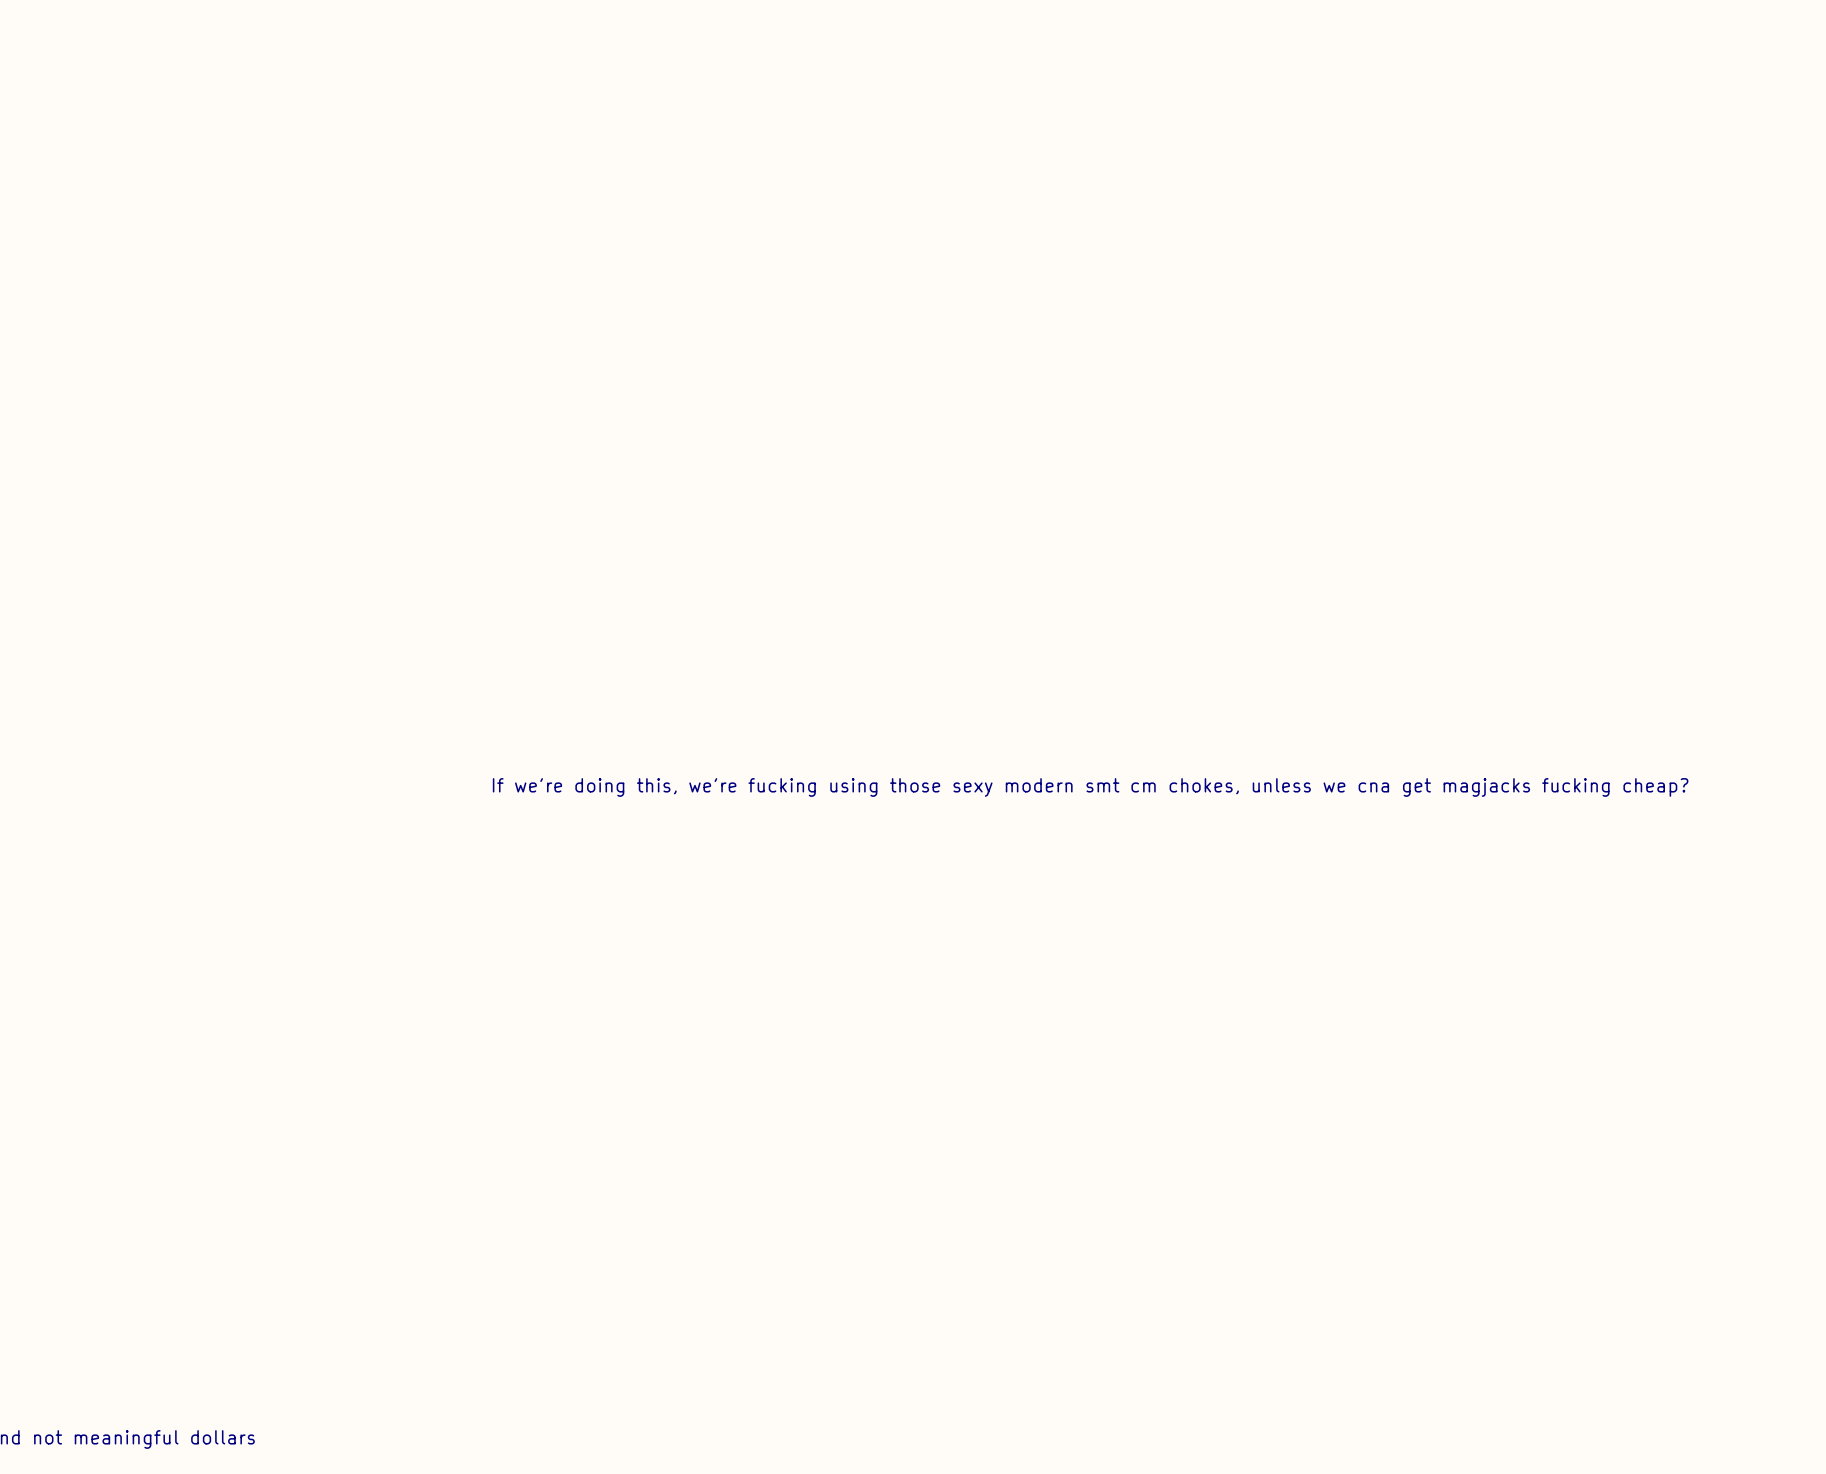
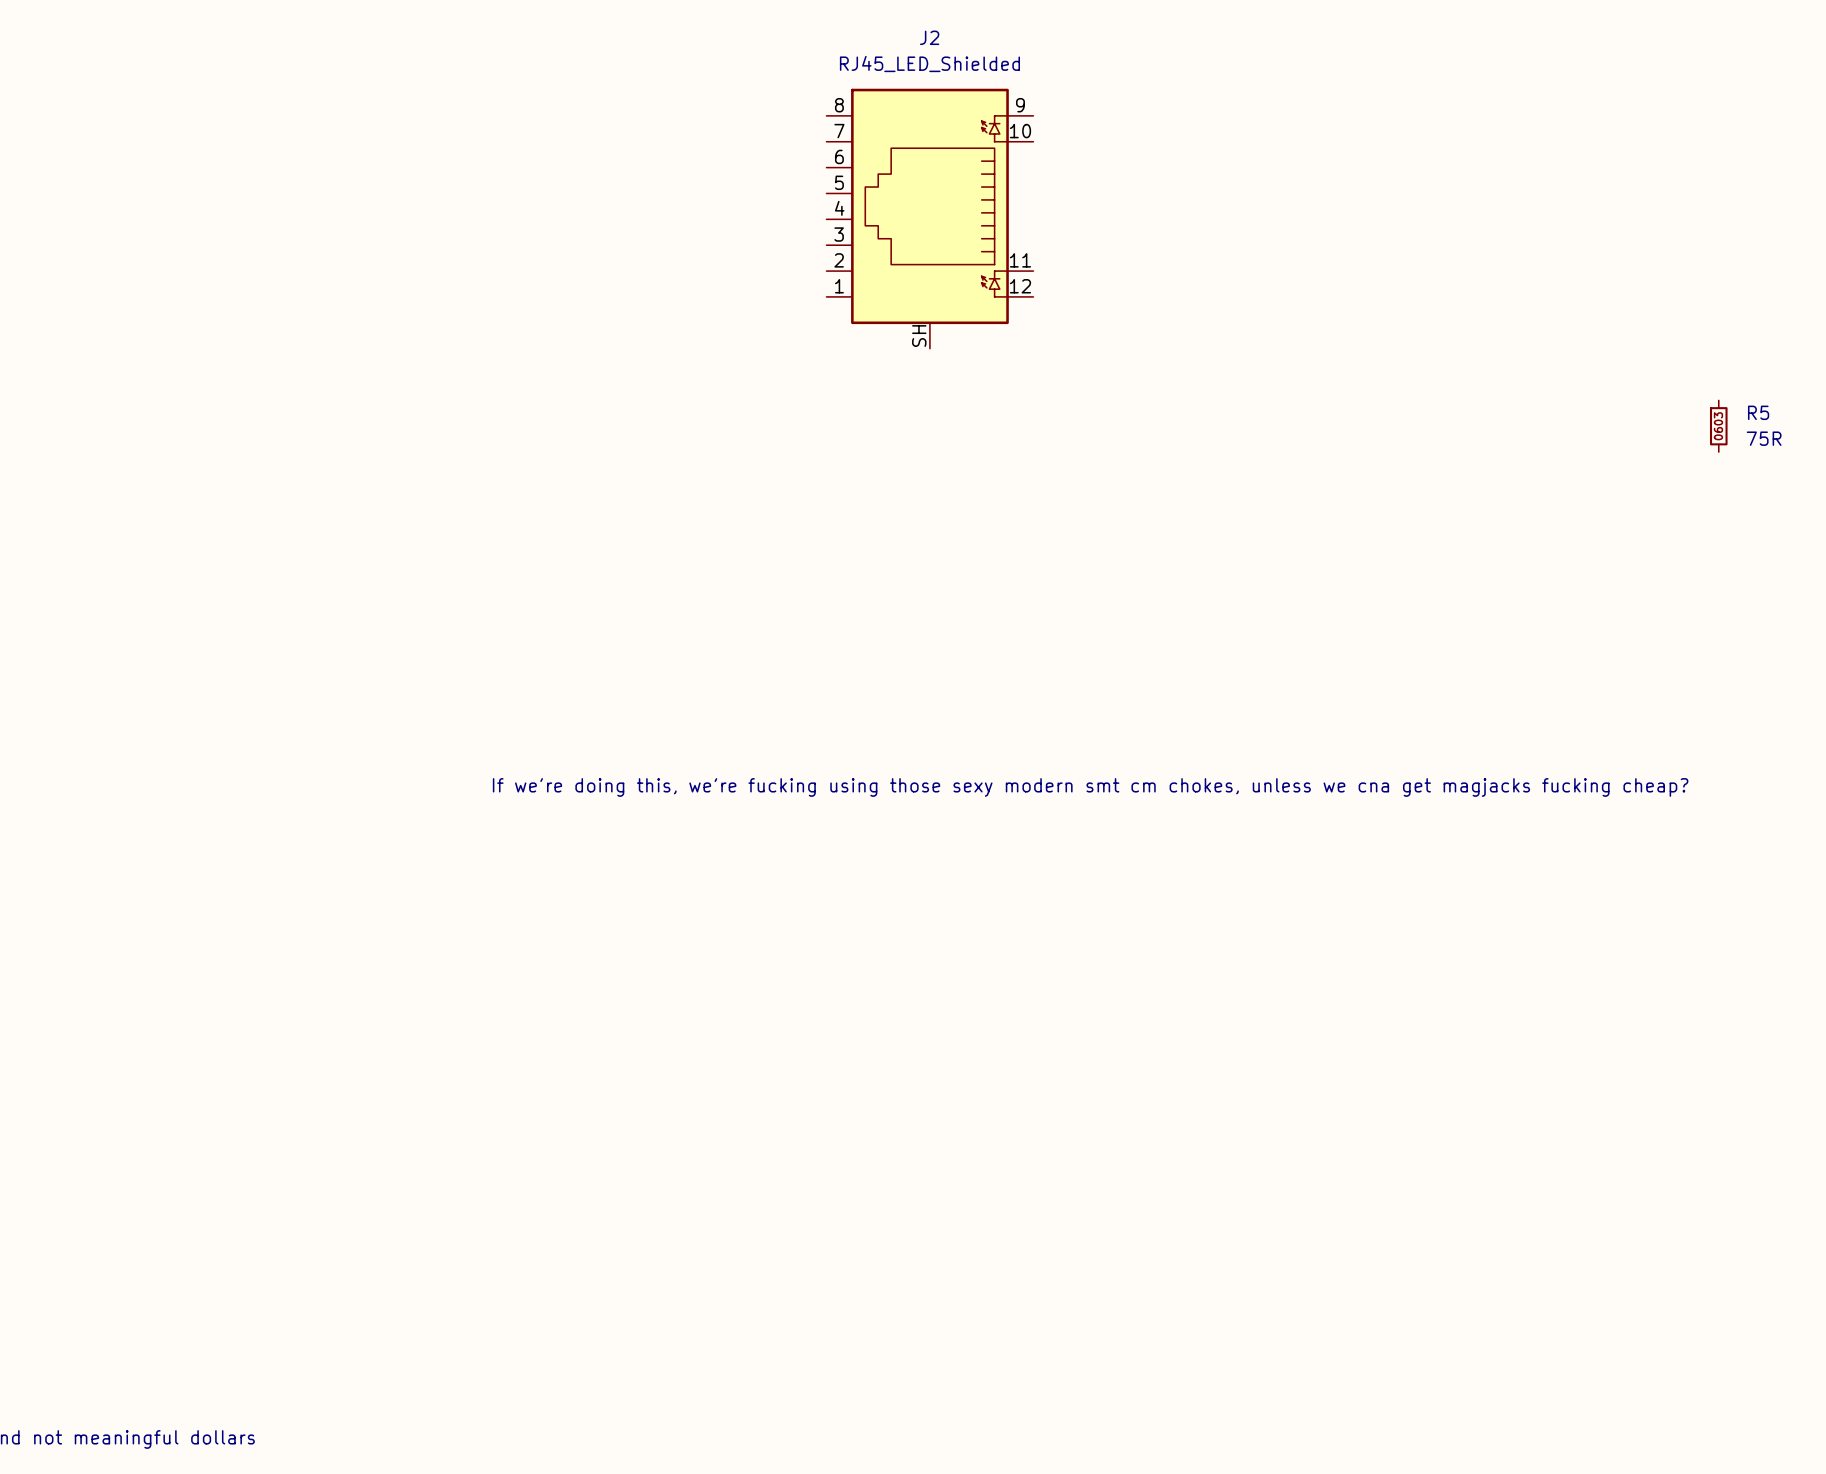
J2: none -> RJ45_LED_Shielded (929, 218)
R5: none -> 75R (1718, 426)

